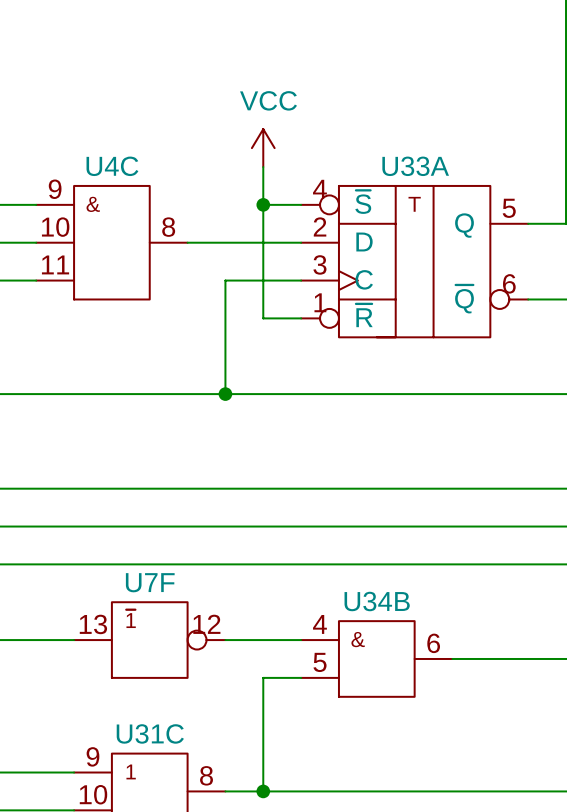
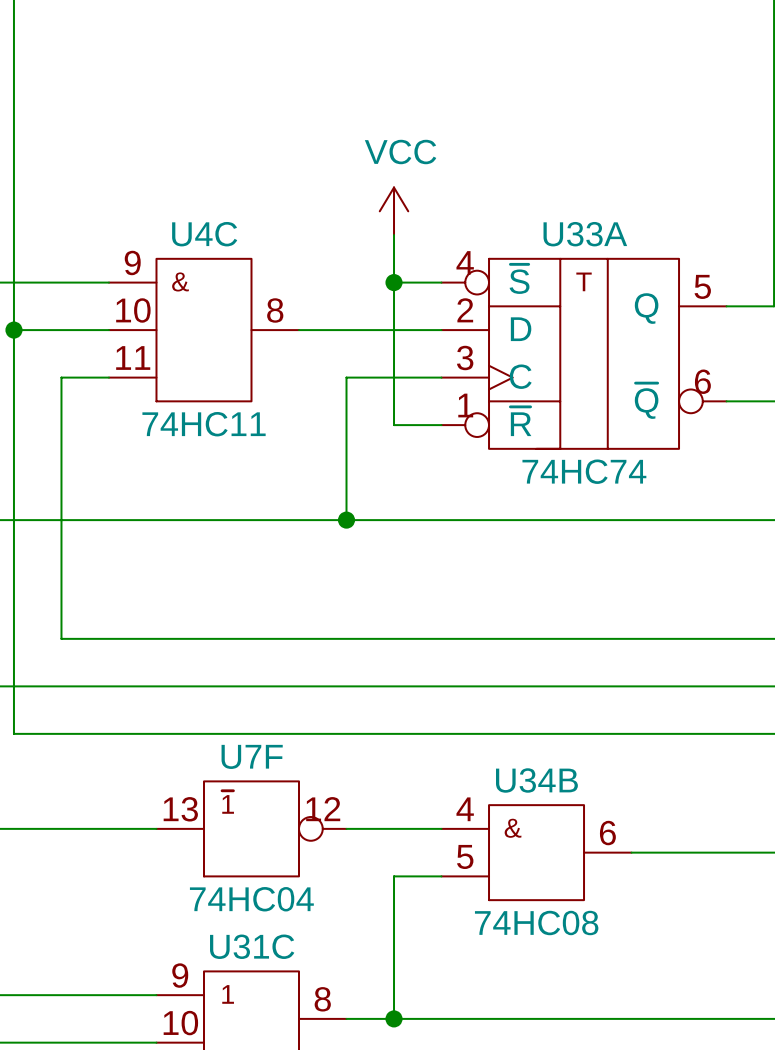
U4C value: none -> 74HC11 (204, 424)
U33A value: none -> 74HC74 (584, 471)
U7F value: none -> 74HC04 (251, 899)
U34B value: none -> 74HC08 (536, 923)

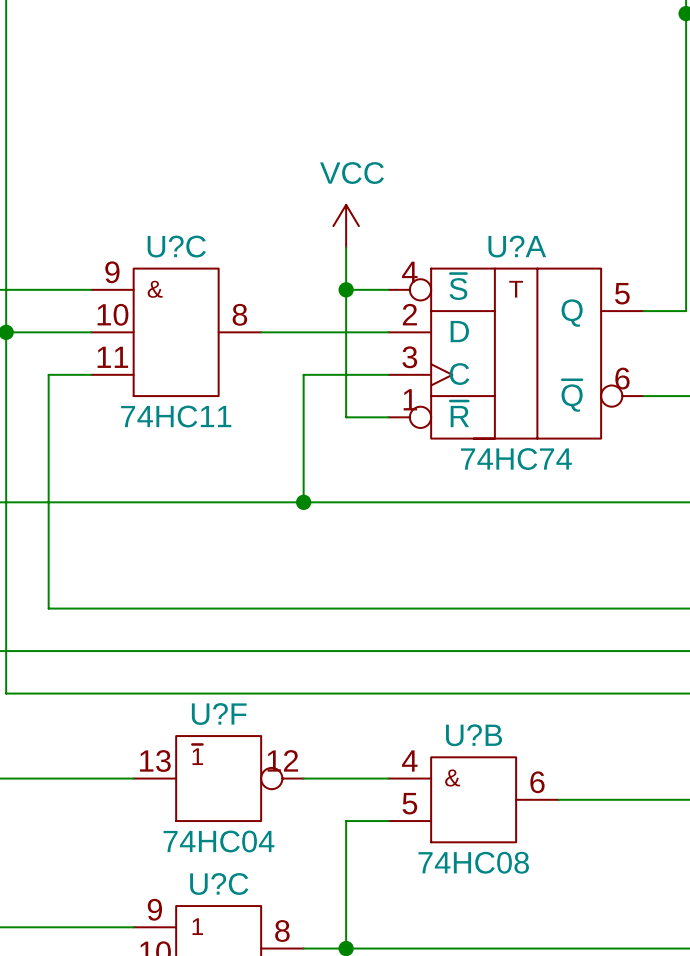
U4C name: U4C (204, 234) -> U?C (176, 246)
U33A name: U33A (585, 234) -> U?A (517, 246)
U7F name: U7F (252, 756) -> U?F (219, 714)
U34B name: U34B (536, 780) -> U?B (474, 735)
U31C name: U31C (252, 946) -> U?C (219, 883)

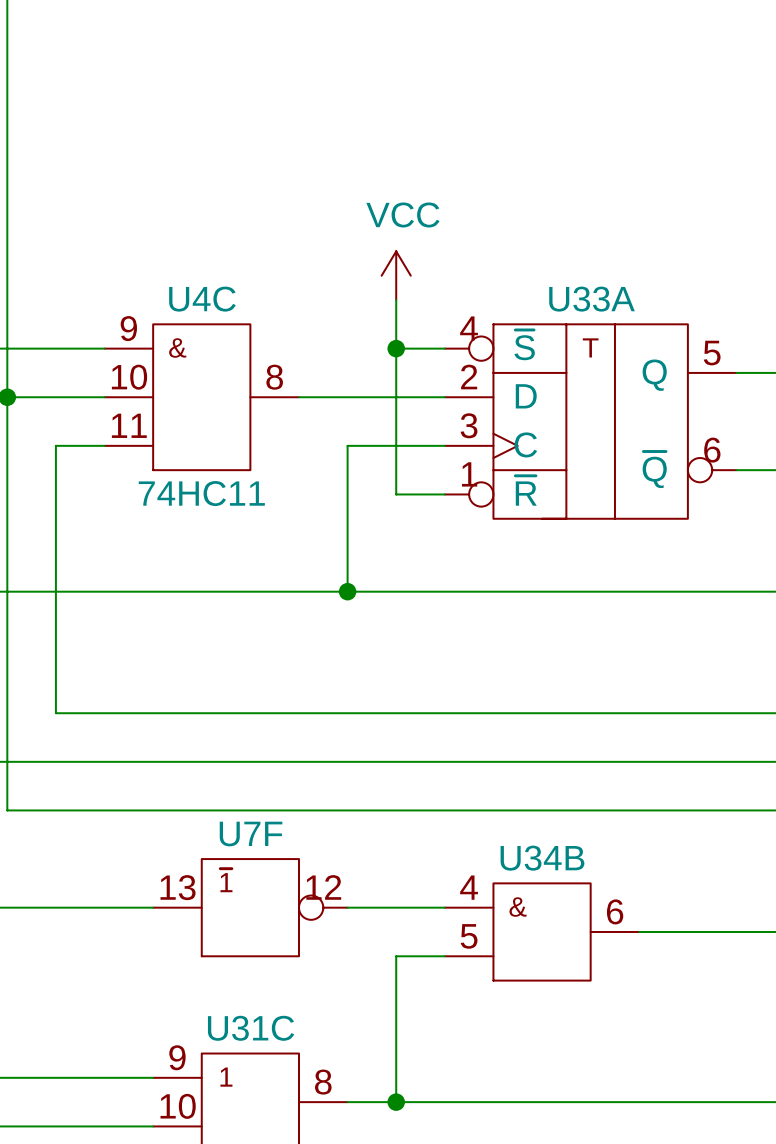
U?C name: U?C (176, 246) -> U4C (202, 299)
U?A name: U?A (517, 246) -> U33A (592, 299)
U?A value: 74HC74 (516, 459) -> none
U?F name: U?F (219, 714) -> U7F (251, 834)
U?B name: U?B (474, 735) -> U34B (542, 858)
U?F value: 74HC04 (218, 841) -> none
U?B value: 74HC08 (473, 862) -> none
U?C name: U?C (219, 883) -> U31C (251, 1028)

